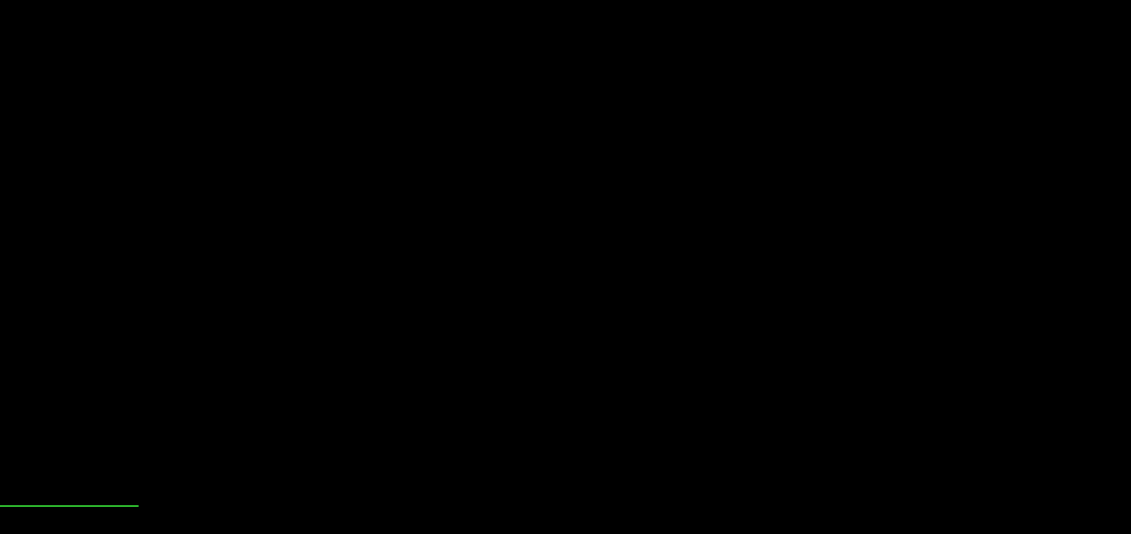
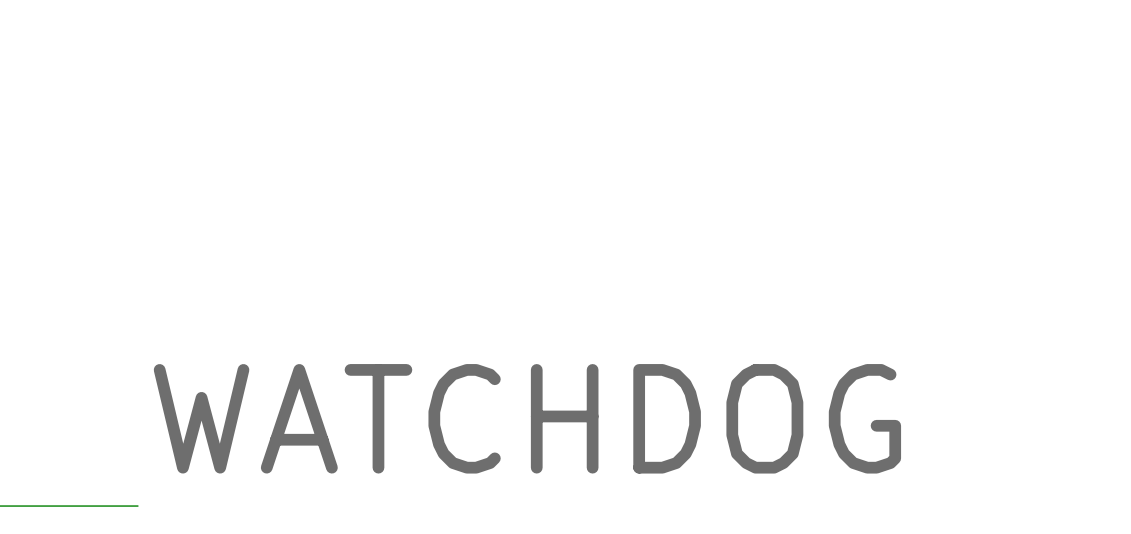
label: none -> WATCHDOG (527, 418)

